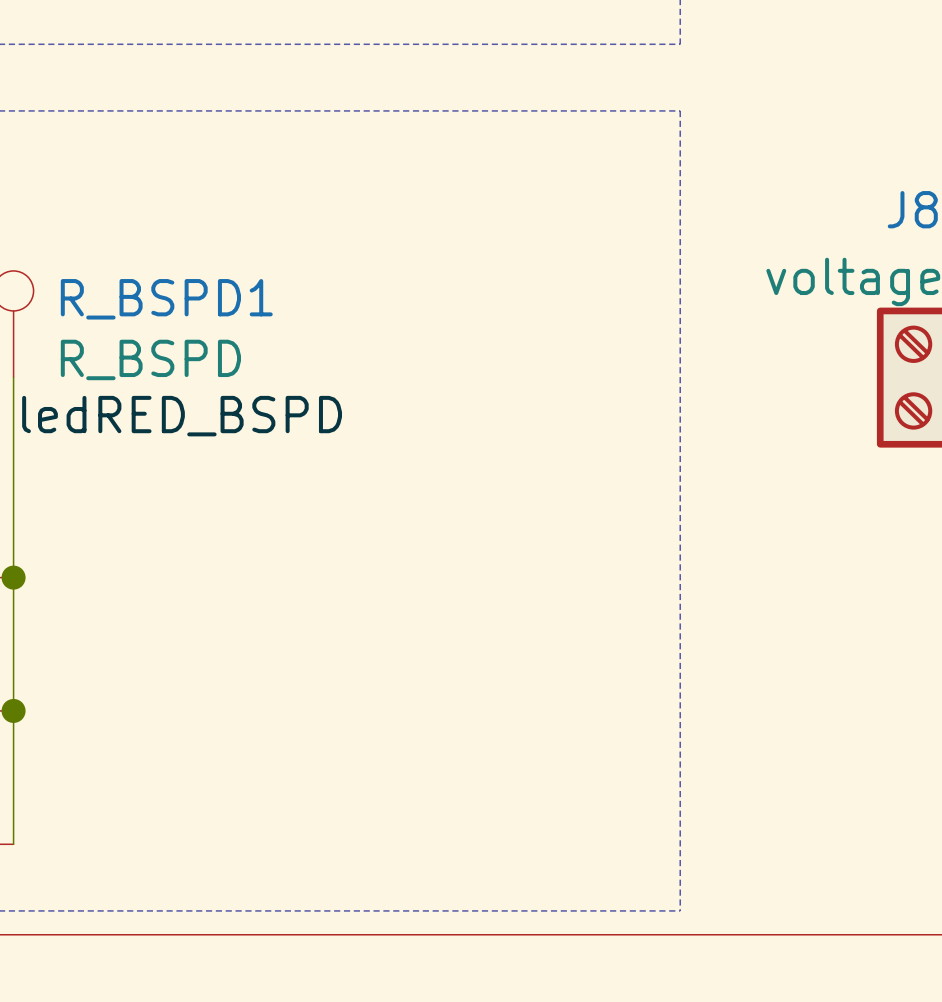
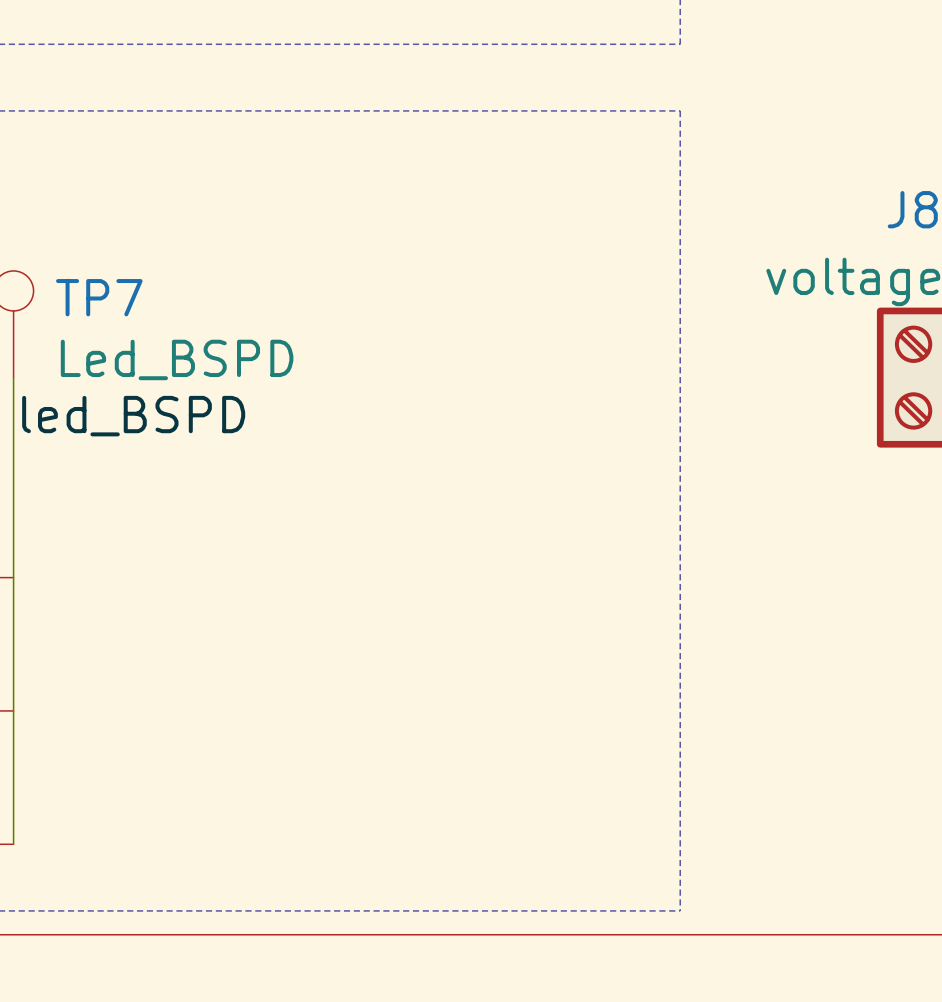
R_BSPD1 name: R_BSPD1 (166, 299) -> TP7 (99, 297)
R_BSPD1 value: R_BSPD (150, 359) -> Led_BSPD (177, 359)
label: ledRED_BSPD (182, 416) -> led_BSPD (133, 416)
junction: (13, 577) -> none
junction: (13, 710) -> none

